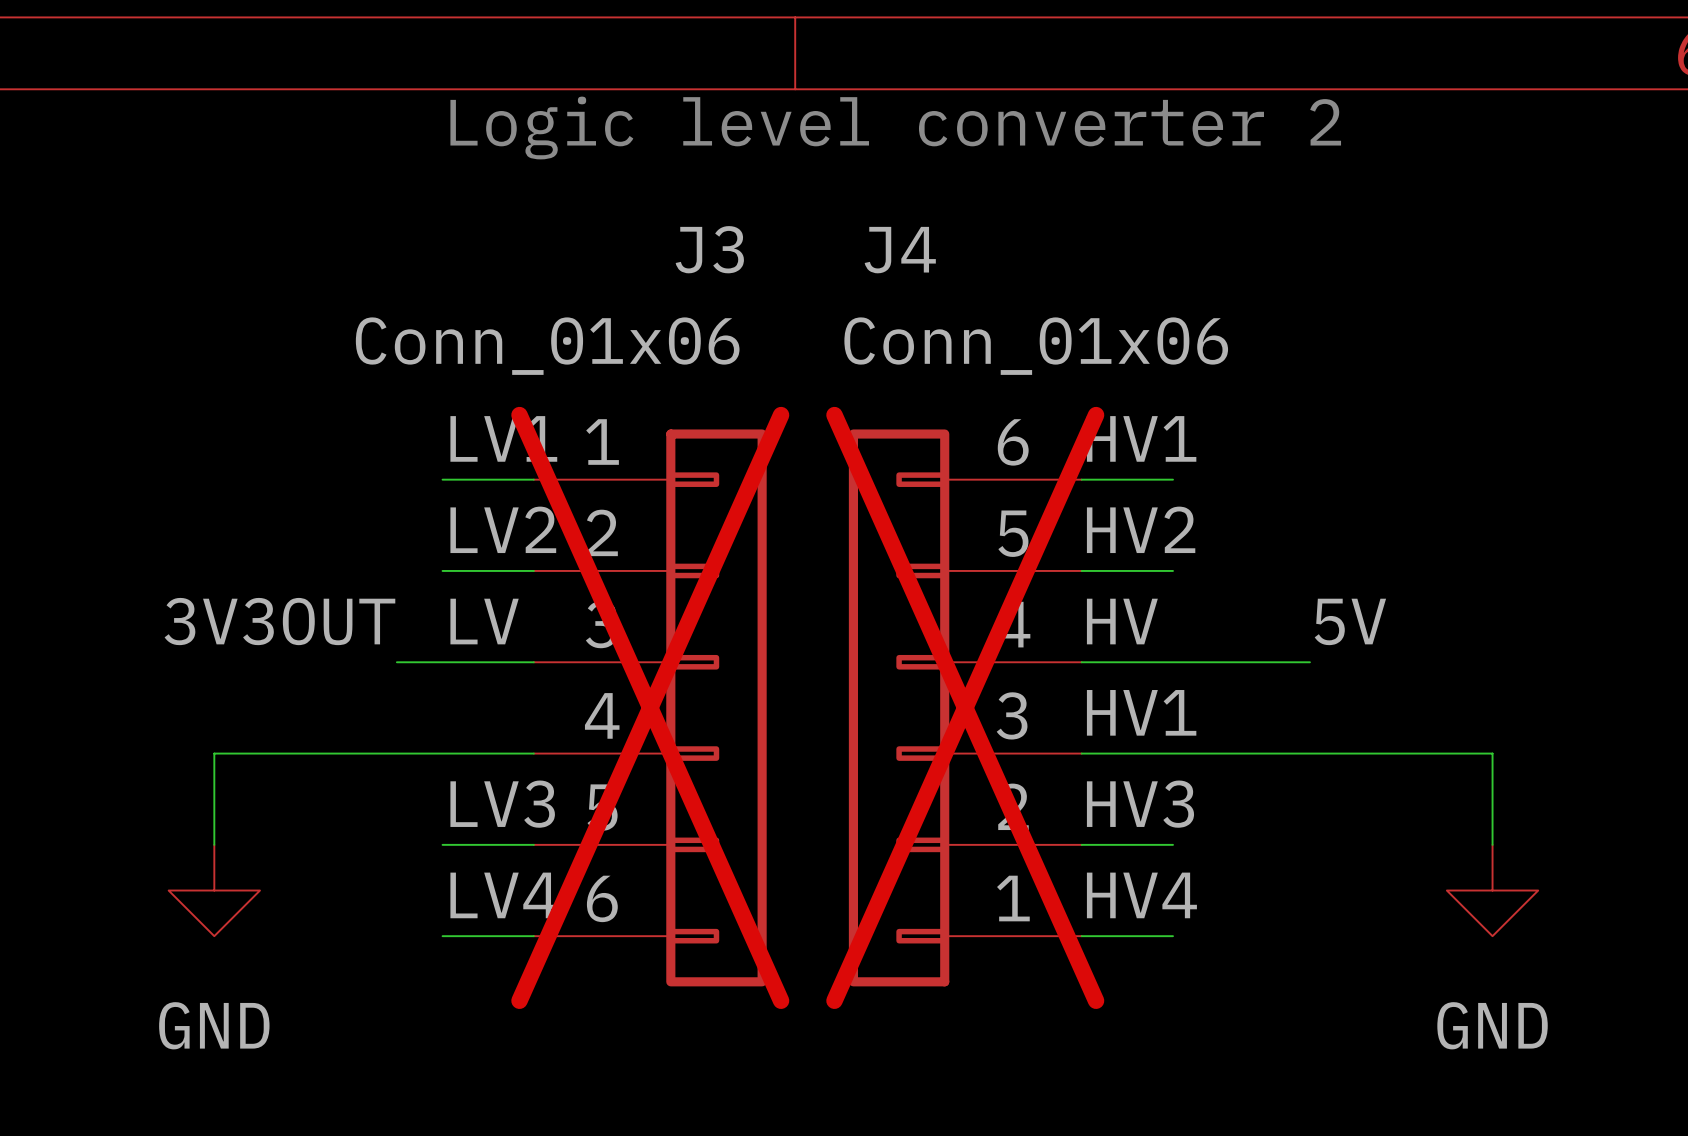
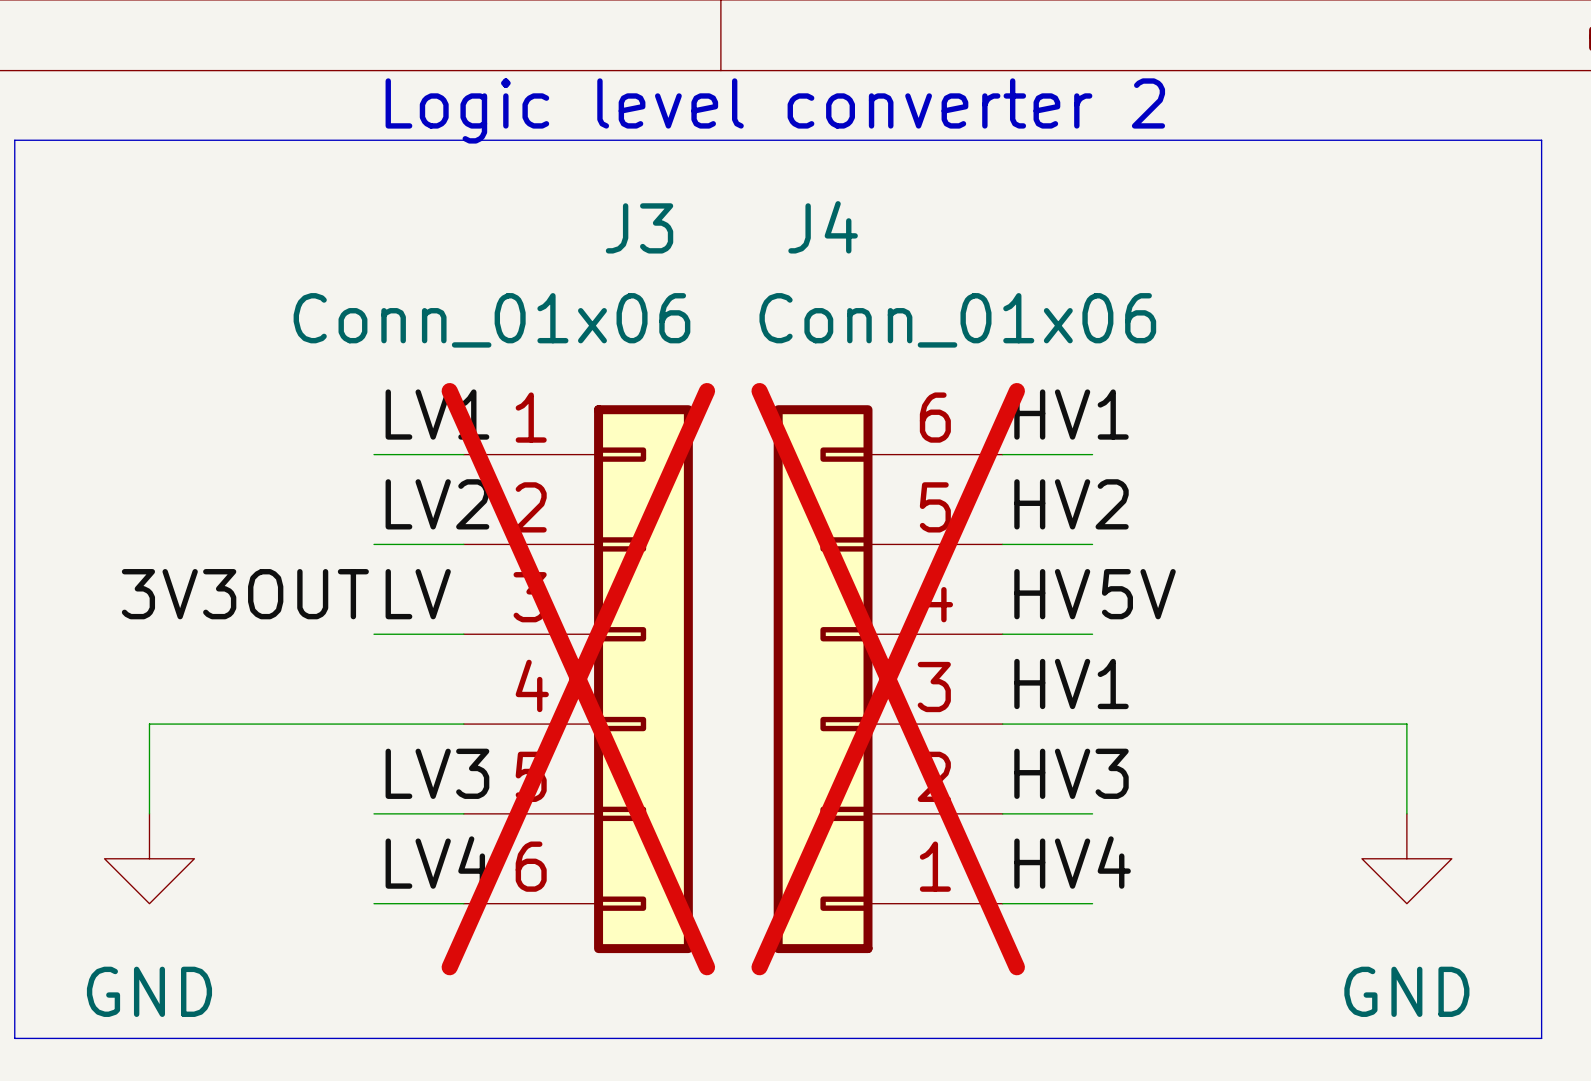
line: none -> (14, 140) (1541, 140) (1541, 1038) (14, 1038) (14, 140)
label position: 3V3OUT (279, 621) -> 3V3OUT (245, 594)
label position: 5V (1350, 621) -> 5V (1138, 594)
wire: (396, 662) (442, 662) -> none
wire: (1172, 662) (1309, 662) -> none

